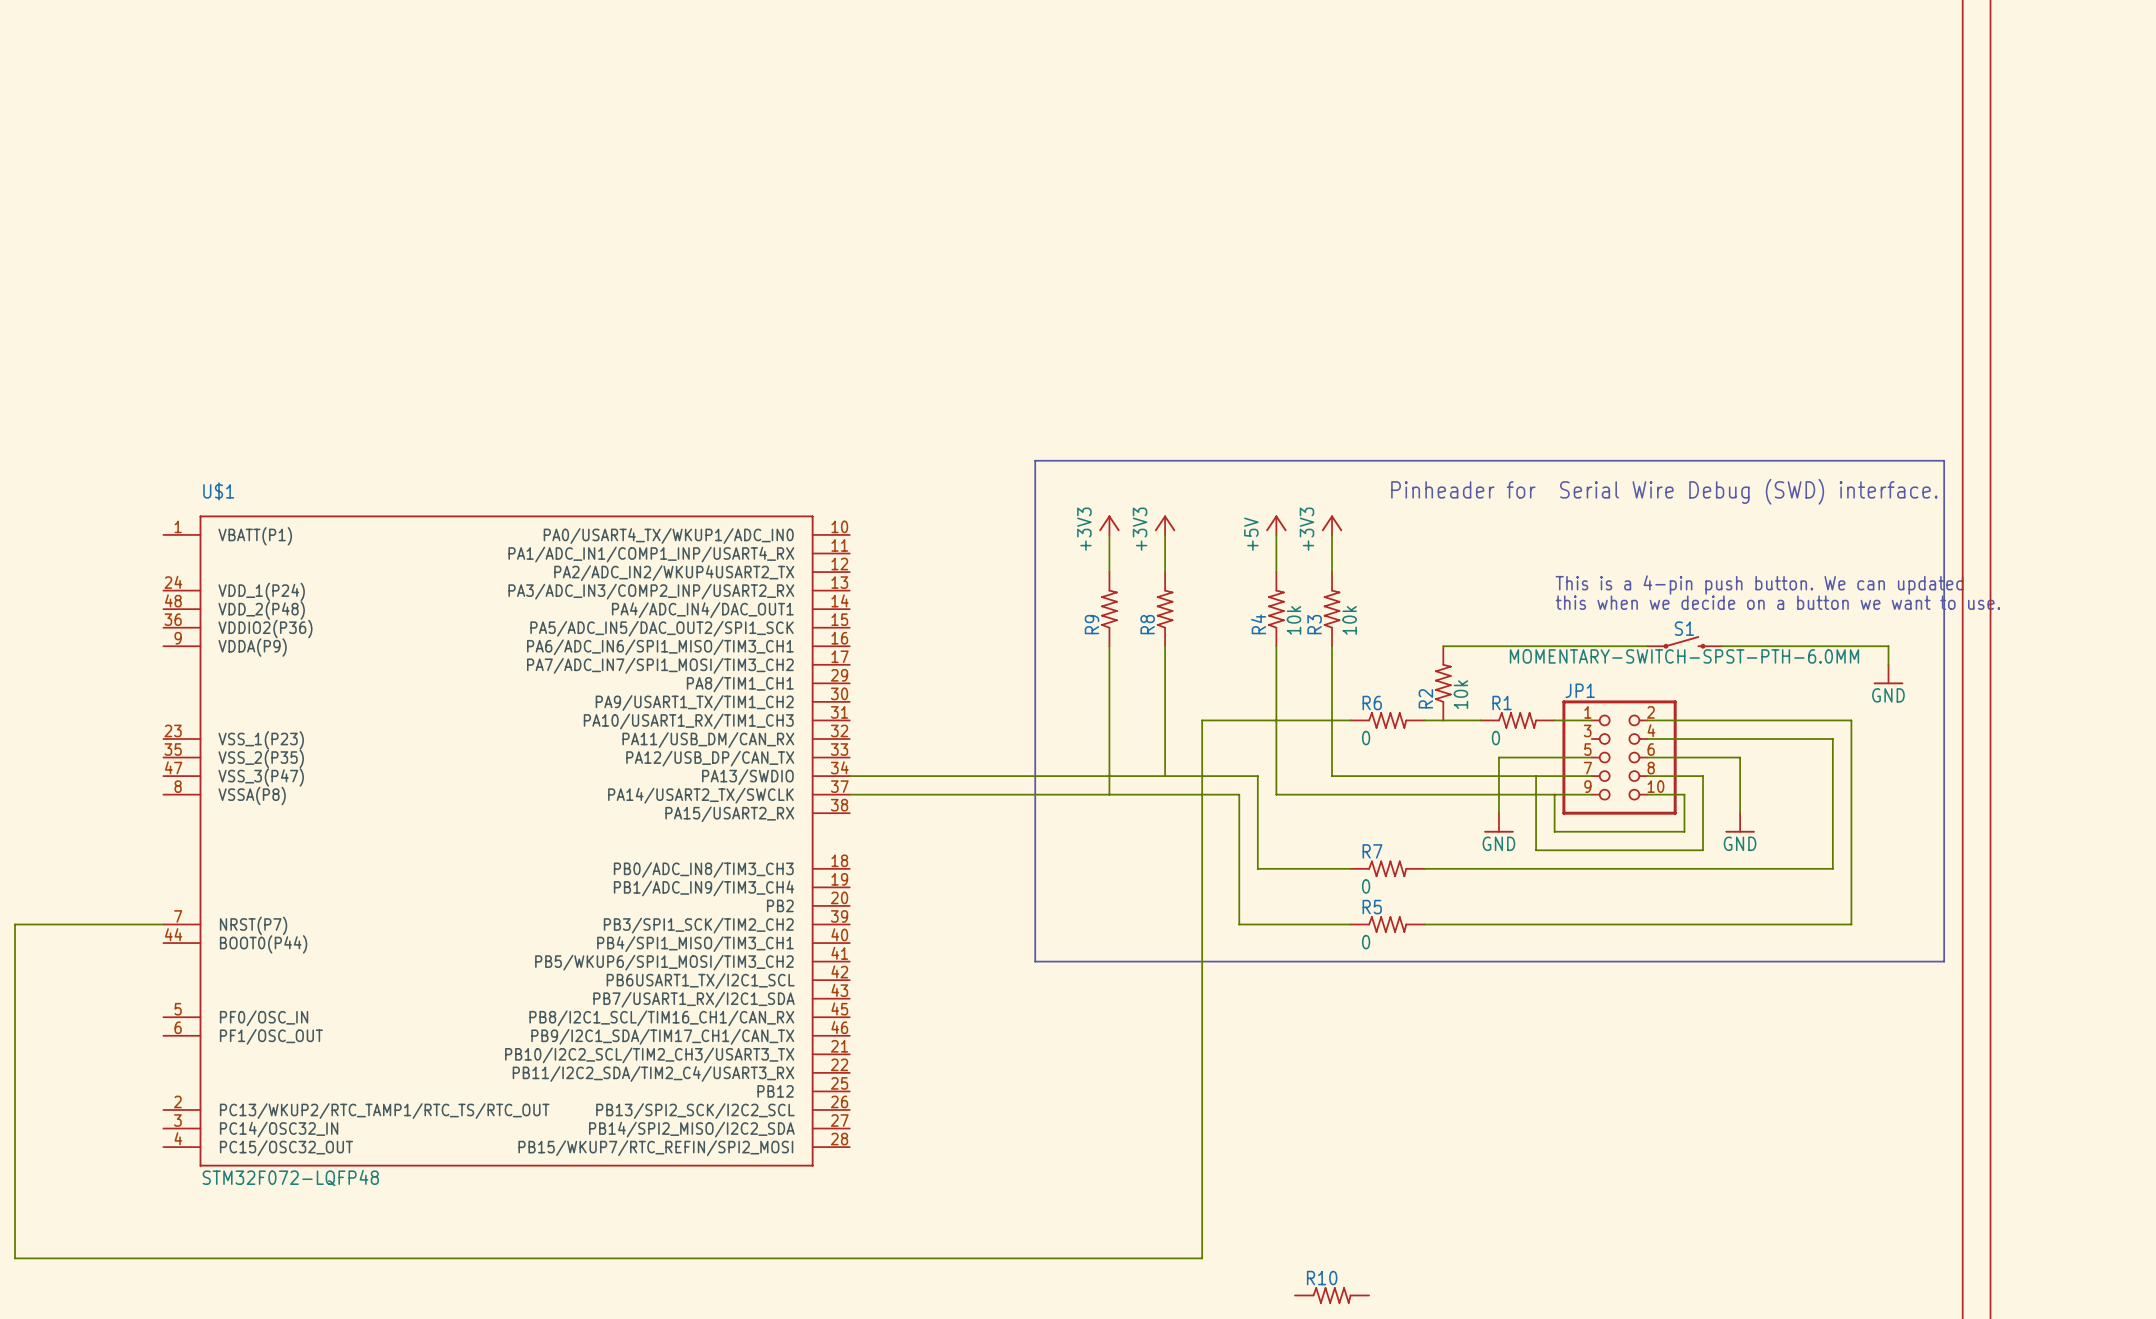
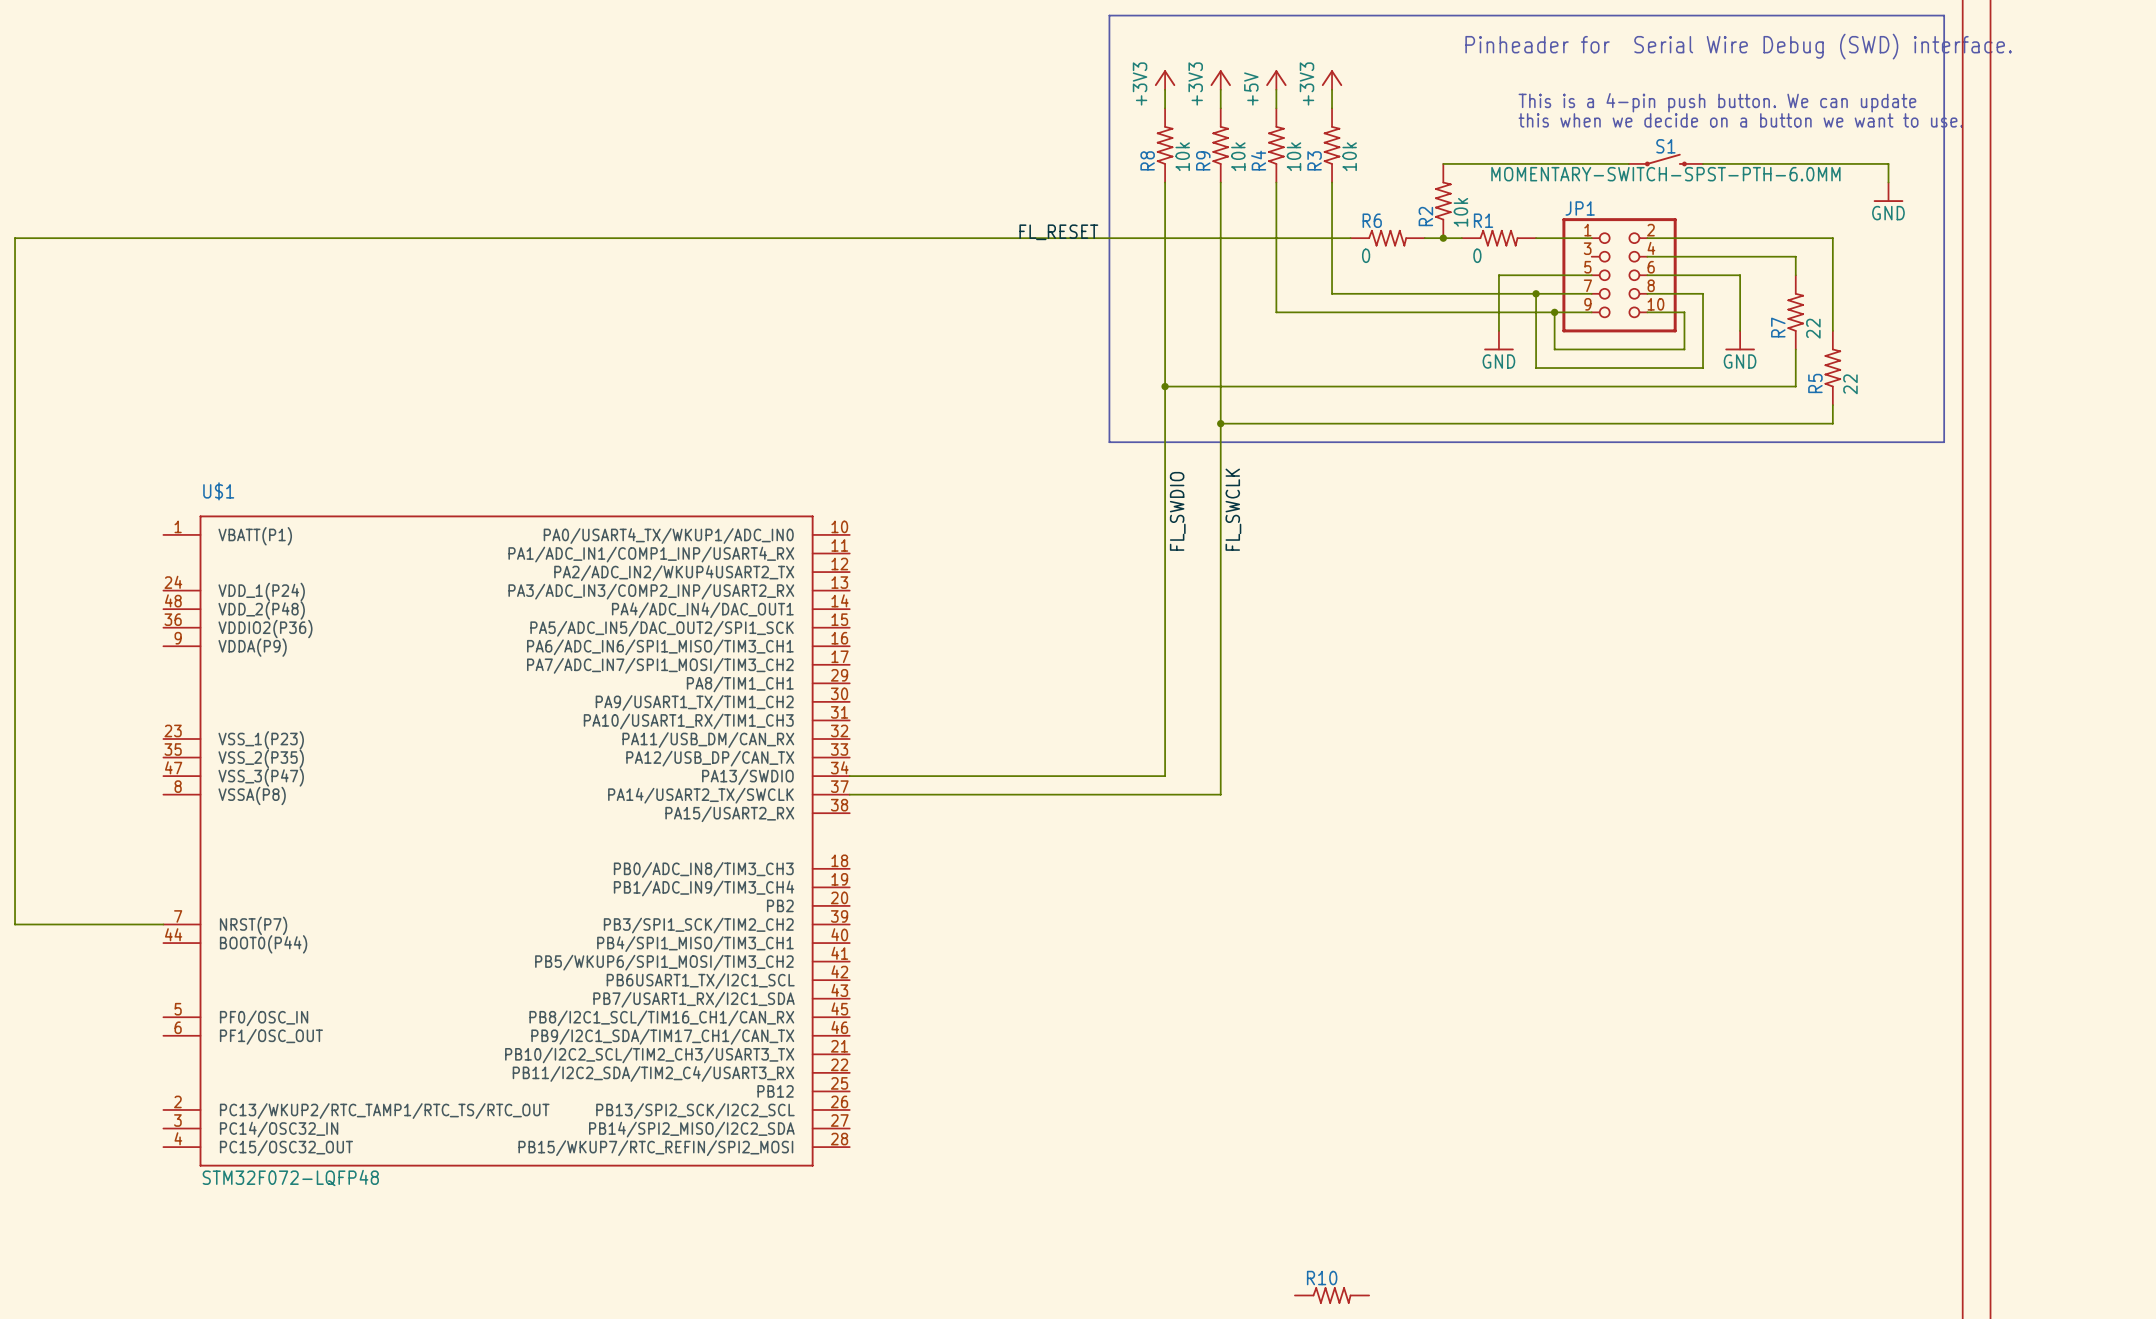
line: none -> (1109, 15) (1109, 442) (1944, 442) (1944, 15) (1109, 15)
text: none -> Pinheader for Serial Wire Debug (SWD) interface. (1738, 46)
power symbol: none -> +3V3 (1165, 80)
power symbol: none -> +3V3 (1220, 80)
power symbol: none -> +5V (1276, 80)
power symbol: none -> +3V3 (1332, 80)
wire: none -> (1165, 89) (1165, 108)
wire: none -> (1220, 89) (1220, 108)
wire: none -> (1276, 89) (1276, 108)
wire: none -> (1332, 89) (1332, 108)
text: none -> This is a 4-pin push button. We can update (1717, 102)
text: none -> this when we decide on a button we want to use. (1740, 120)
R8 value: none -> 10k (1182, 156)
R9 value: none -> 10k (1238, 156)
wire: none -> (1443, 163) (1628, 163)
wire: none -> (1703, 163) (1888, 163) (1888, 182)
wire: none -> (1165, 182) (1165, 534)
wire: none -> (1276, 182) (1276, 312) (1591, 312)
wire: none -> (1332, 182) (1332, 293) (1591, 293)
power symbol: none -> GND (1888, 192)
label: none -> FL_RESET (1058, 232)
wire: none -> (1424, 238) (1461, 238)
junction: none -> (1443, 238)
wire: none -> (1536, 238) (1591, 238)
wire: none -> (1647, 238) (1832, 238) (1832, 330)
wire: none -> (1647, 256) (1795, 256) (1795, 275)
wire: none -> (1591, 275) (1498, 275) (1498, 330)
wire: none -> (1647, 275) (1740, 275) (1740, 330)
wire: none -> (1536, 293) (1536, 368) (1703, 368) (1703, 293) (1647, 293)
junction: none -> (1536, 293)
wire: none -> (1554, 312) (1554, 349) (1684, 349) (1684, 312) (1647, 312)
junction: none -> (1554, 312)
power symbol: none -> GND (1498, 340)
power symbol: none -> GND (1740, 340)
wire: none -> (1795, 349) (1795, 386) (1165, 386)
junction: none -> (1165, 386)
wire: none -> (1832, 405) (1832, 423) (1220, 423)
junction: none -> (1220, 423)
line: (1035, 460) (1035, 961) (1944, 961) (1944, 460) (1035, 460) -> none
text: Pinheader for Serial Wire Debug (SWD) interface. (1664, 491) -> none
label: none -> FL_SWCLK (1233, 509)
label: none -> FL_SWDIO (1177, 511)
power symbol: +3V3 (1109, 525) -> none
power symbol: +3V3 (1165, 525) -> none
power symbol: +5V (1276, 525) -> none
power symbol: +3V3 (1332, 525) -> none
wire: (1109, 534) (1109, 572) -> none
wire: (1276, 534) (1276, 572) -> none
wire: (1332, 534) (1332, 572) -> none
text: This is a 4-pin push button. We can updated (1759, 585) -> none
text: this when we decide on a button we want to use. (1777, 602) -> none
R9 position: (1109, 609) -> (1220, 145)
R8 position: (1165, 609) -> (1165, 145)
R4 position: (1276, 609) -> (1276, 145)
R3 position: (1332, 609) -> (1332, 145)
S1 position: (1684, 642) -> (1665, 160)
wire: (1109, 646) (1109, 794) -> none
wire: (1276, 646) (1276, 794) (1591, 794) -> none
wire: (1332, 646) (1332, 776) (1591, 776) -> none
wire: (1443, 646) (1647, 646) -> none
wire: (1721, 646) (1888, 646) (1888, 664) -> none
power symbol: GND (1888, 674) -> none
R2 position: (1443, 683) -> (1443, 201)
wire: (1350, 720) (1202, 720) (1202, 1258) (15, 1258) (15, 924) -> (1350, 238) (15, 238) (15, 924)
R6 position: (1387, 720) -> (1387, 238)
wire: (1424, 720) (1480, 720) -> none
R1 position: (1517, 720) -> (1498, 238)
wire: (1554, 720) (1591, 720) -> none
wire: (1647, 720) (1851, 720) (1851, 924) (1424, 924) -> none
wire: (1647, 739) (1832, 739) (1832, 868) (1424, 868) -> none
wire: (1591, 757) (1498, 757) (1498, 813) -> none
JP1 position: (1619, 757) -> (1619, 275)
wire: (1647, 757) (1740, 757) (1740, 813) -> none
wire: (1165, 776) (1257, 776) (1257, 868) (1350, 868) -> none
wire: (1536, 776) (1536, 850) (1703, 850) (1703, 776) (1647, 776) -> none
wire: (1220, 794) (1239, 794) (1239, 924) (1350, 924) -> (1220, 794) (1220, 182)
wire: (1554, 794) (1554, 831) (1684, 831) (1684, 794) (1647, 794) -> none
power symbol: GND (1498, 822) -> none
power symbol: GND (1740, 822) -> none
R7 rotation: 0° (1387, 868) -> 90° counterclockwise (1795, 312)
R7 position: (1387, 868) -> (1795, 312)
R7 value: 0 (1366, 886) -> 22 (1813, 328)
R5 rotation: 0° (1387, 924) -> 90° counterclockwise (1832, 368)
R5 position: (1387, 924) -> (1832, 368)
R5 value: 0 (1366, 942) -> 22 (1850, 384)

